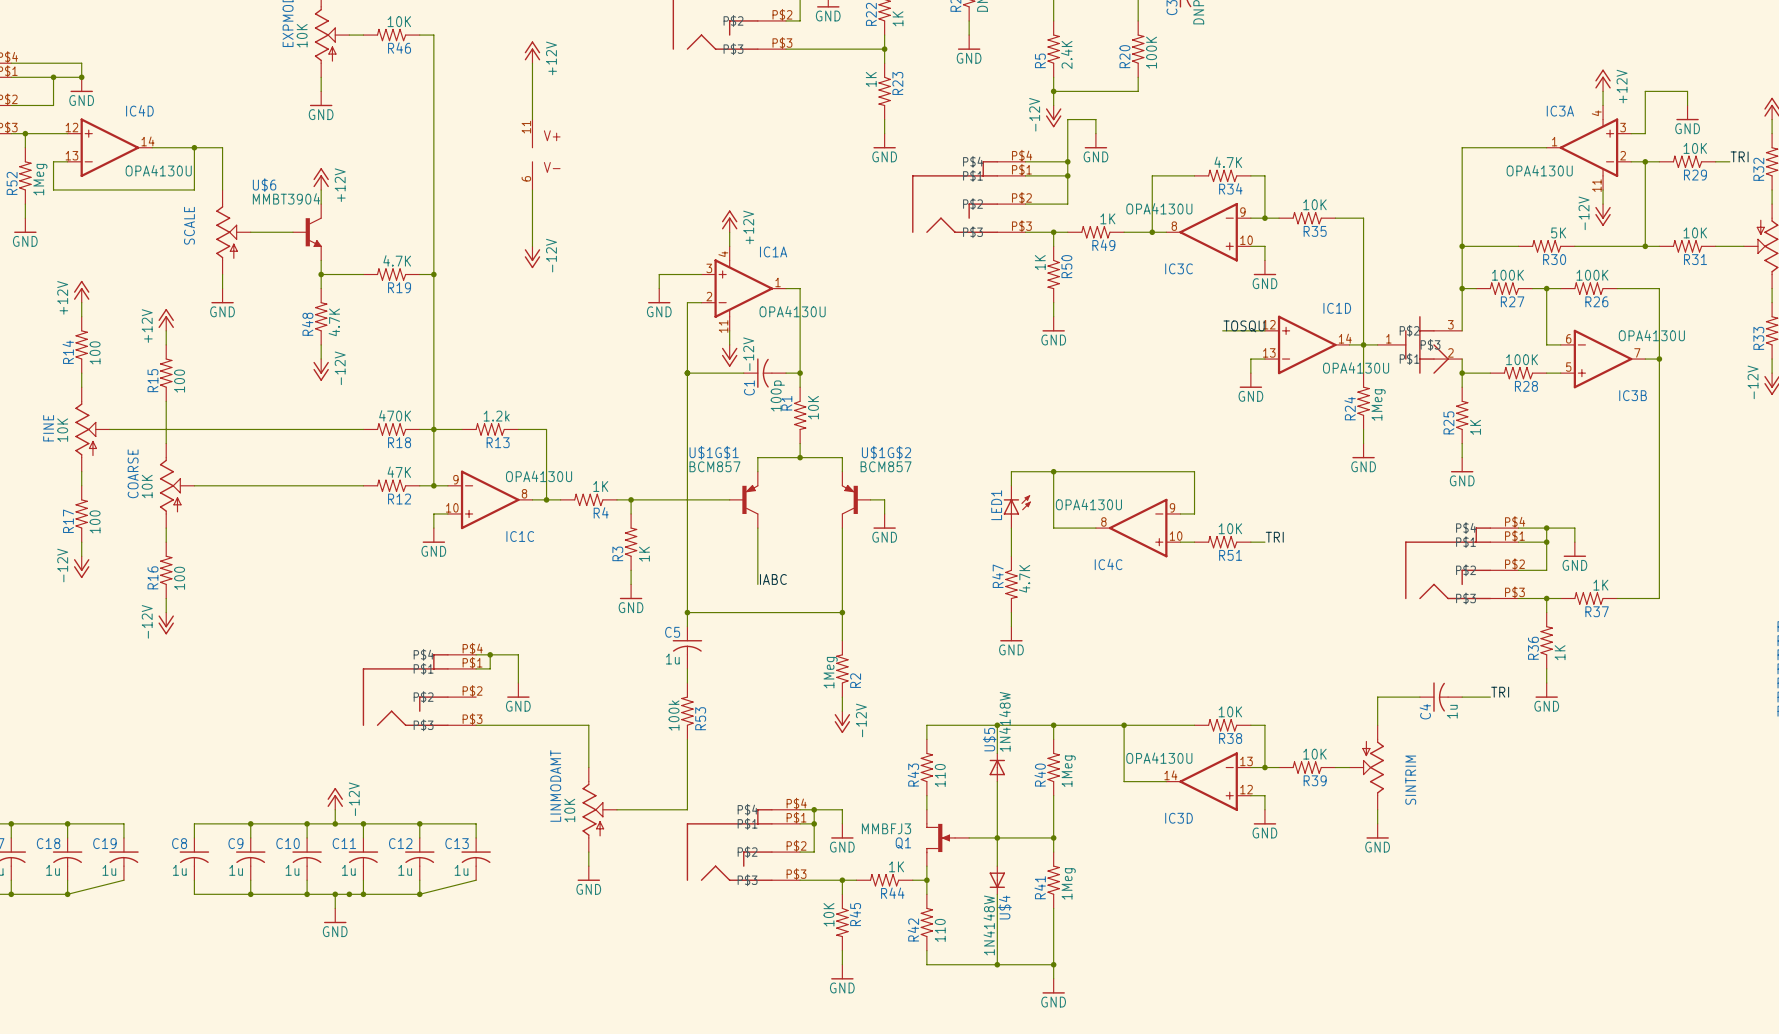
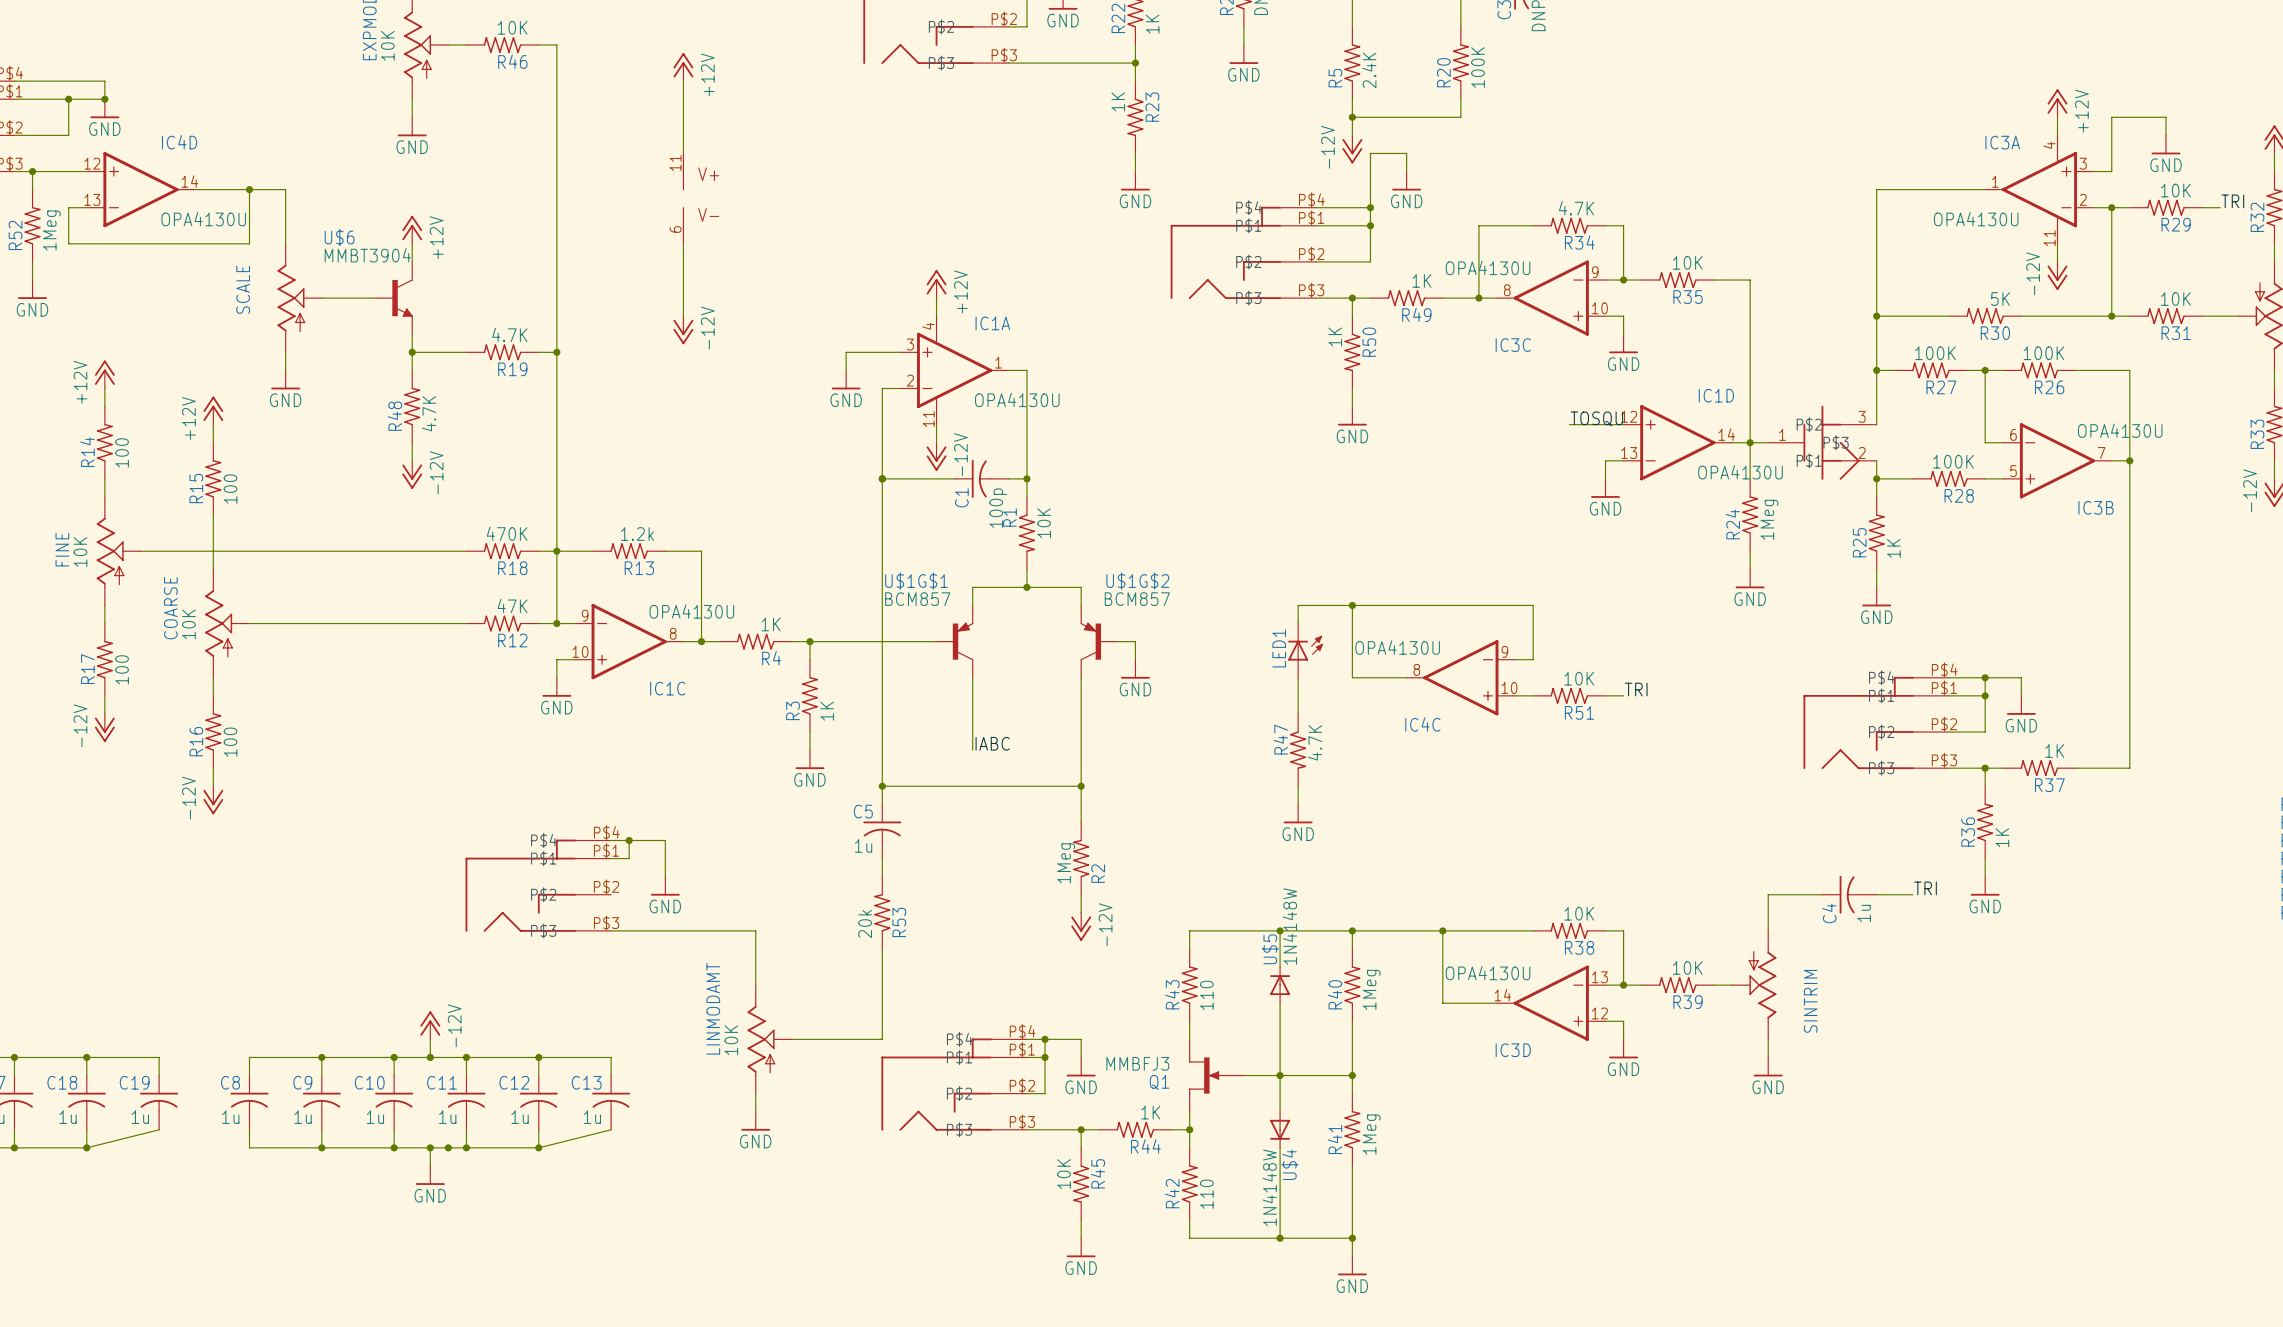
R53 value: 100k (674, 715) -> 20k (865, 924)

